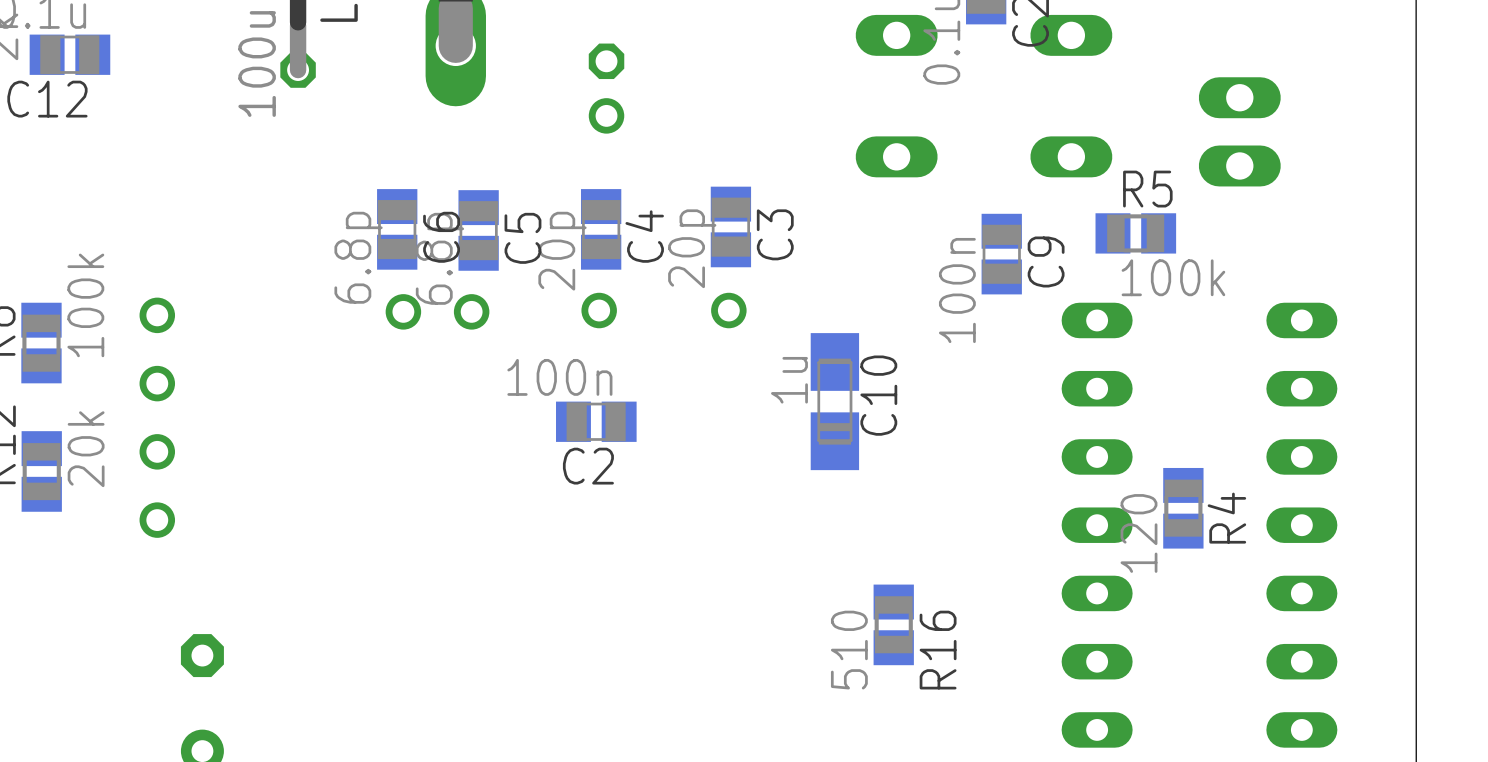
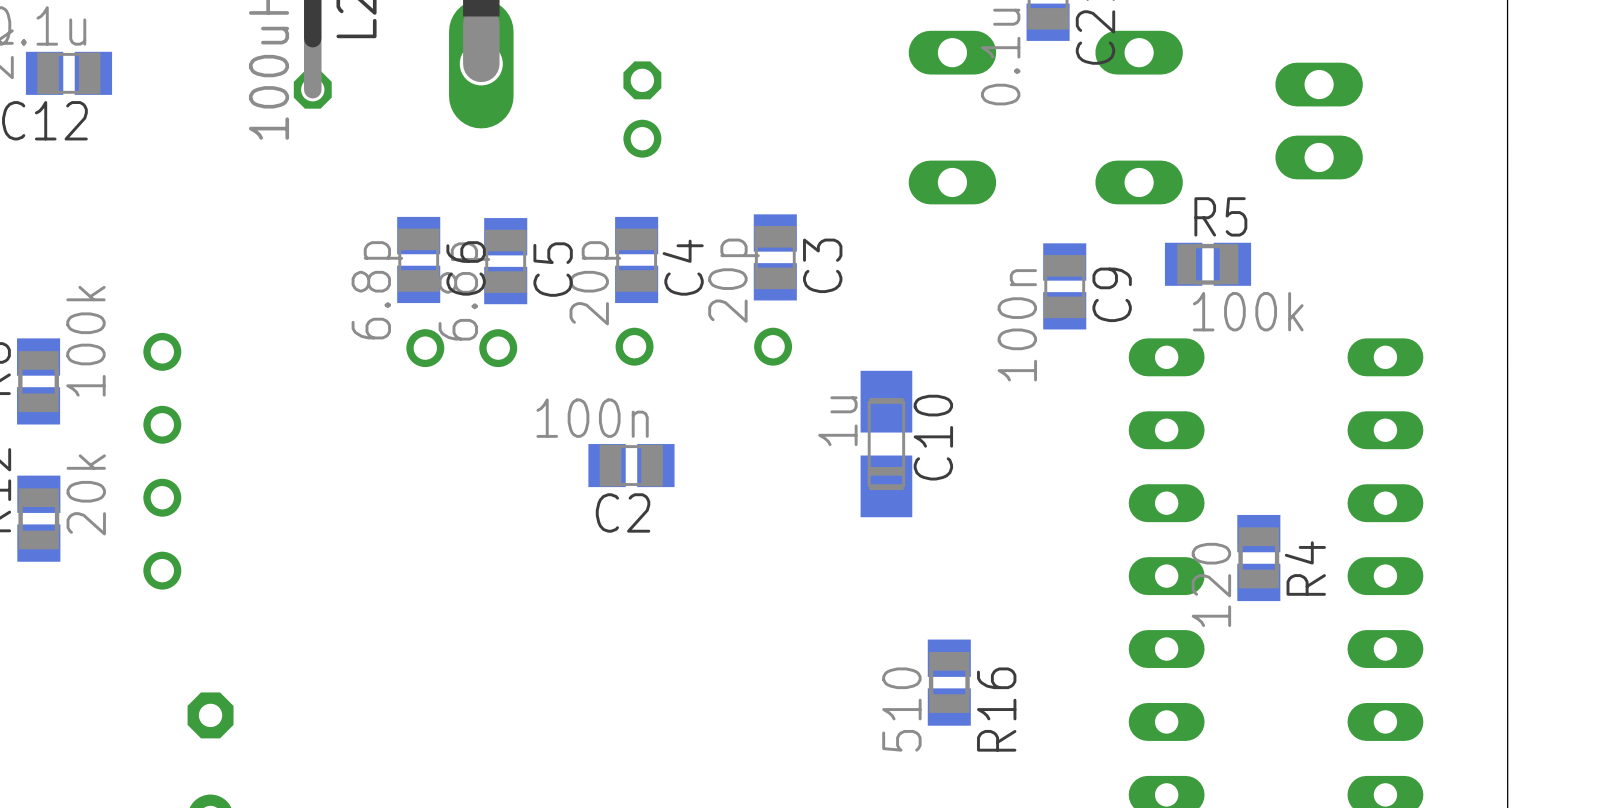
part position: (1239, 131) -> (1319, 121)

